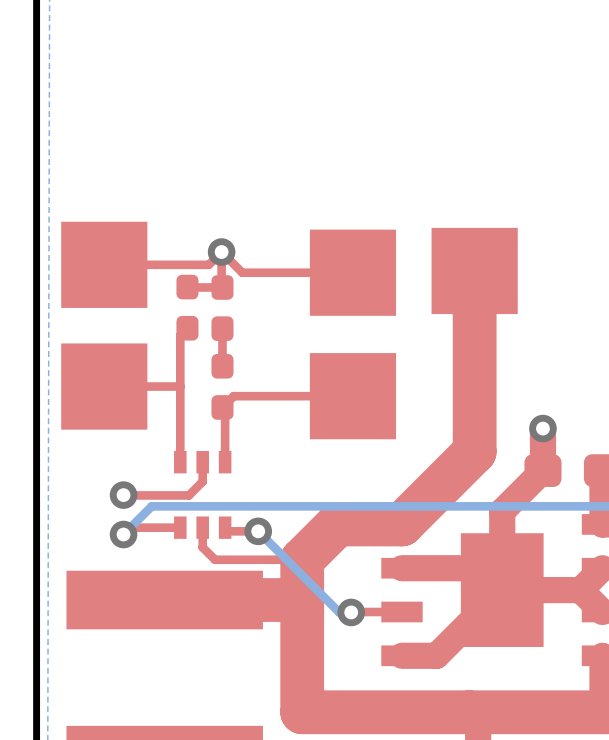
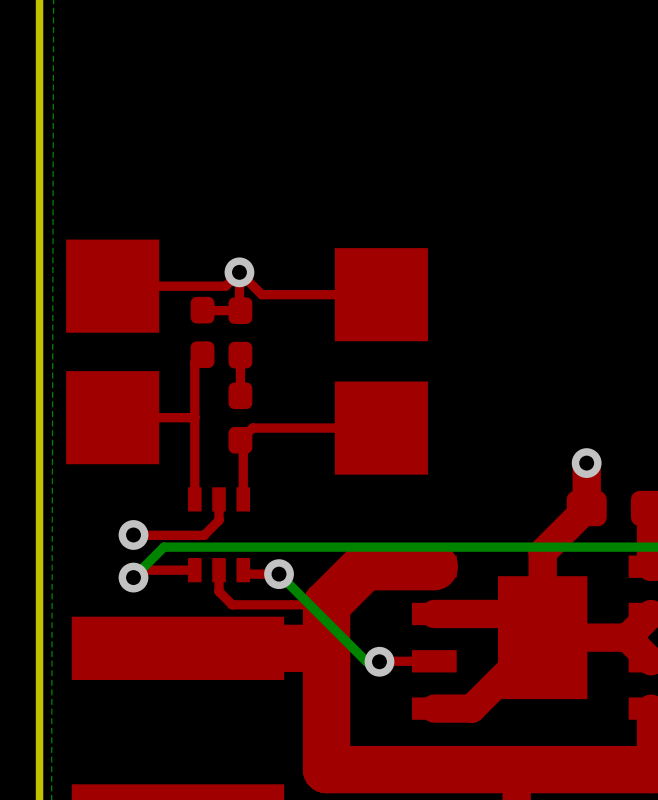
top track: (474, 270) (474, 451) (401, 524) -> none
part: (474, 270) -> none

